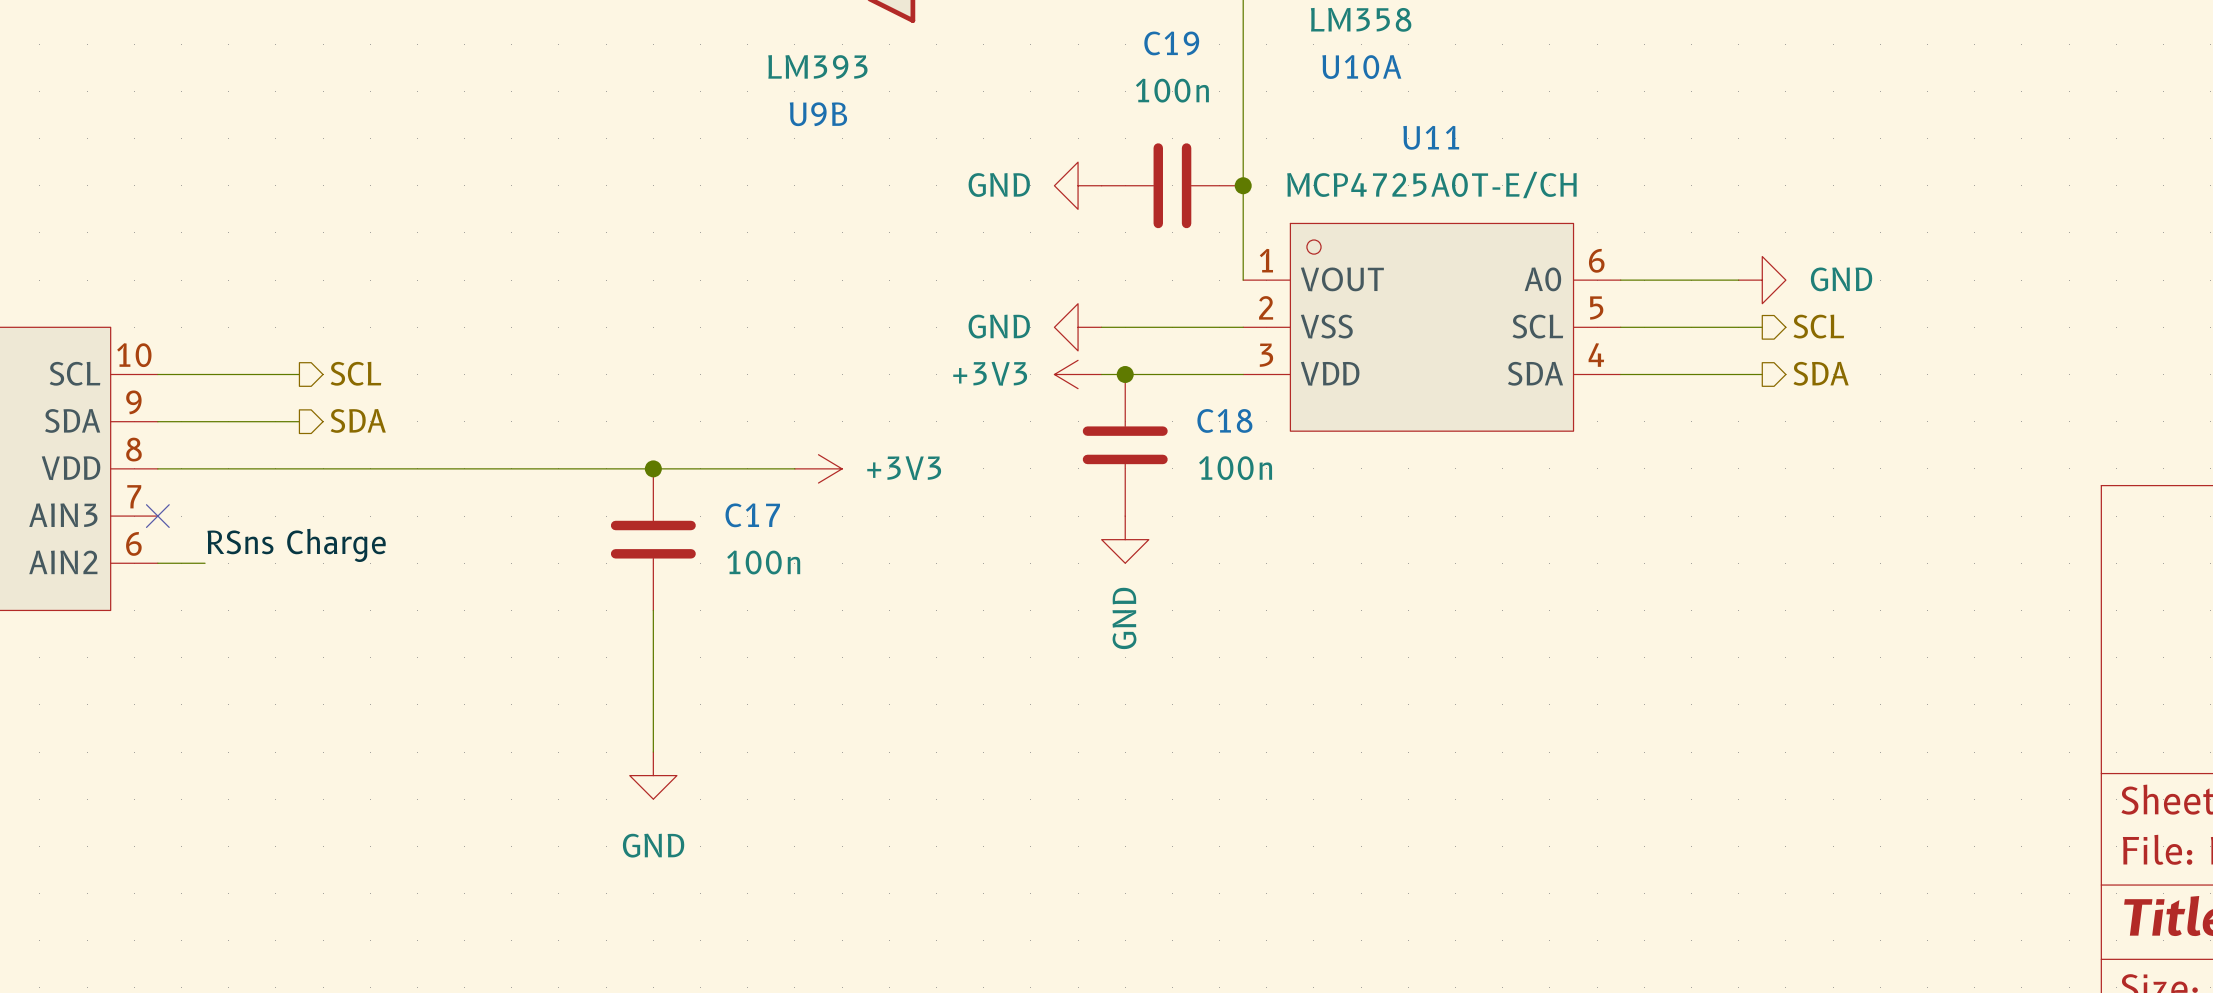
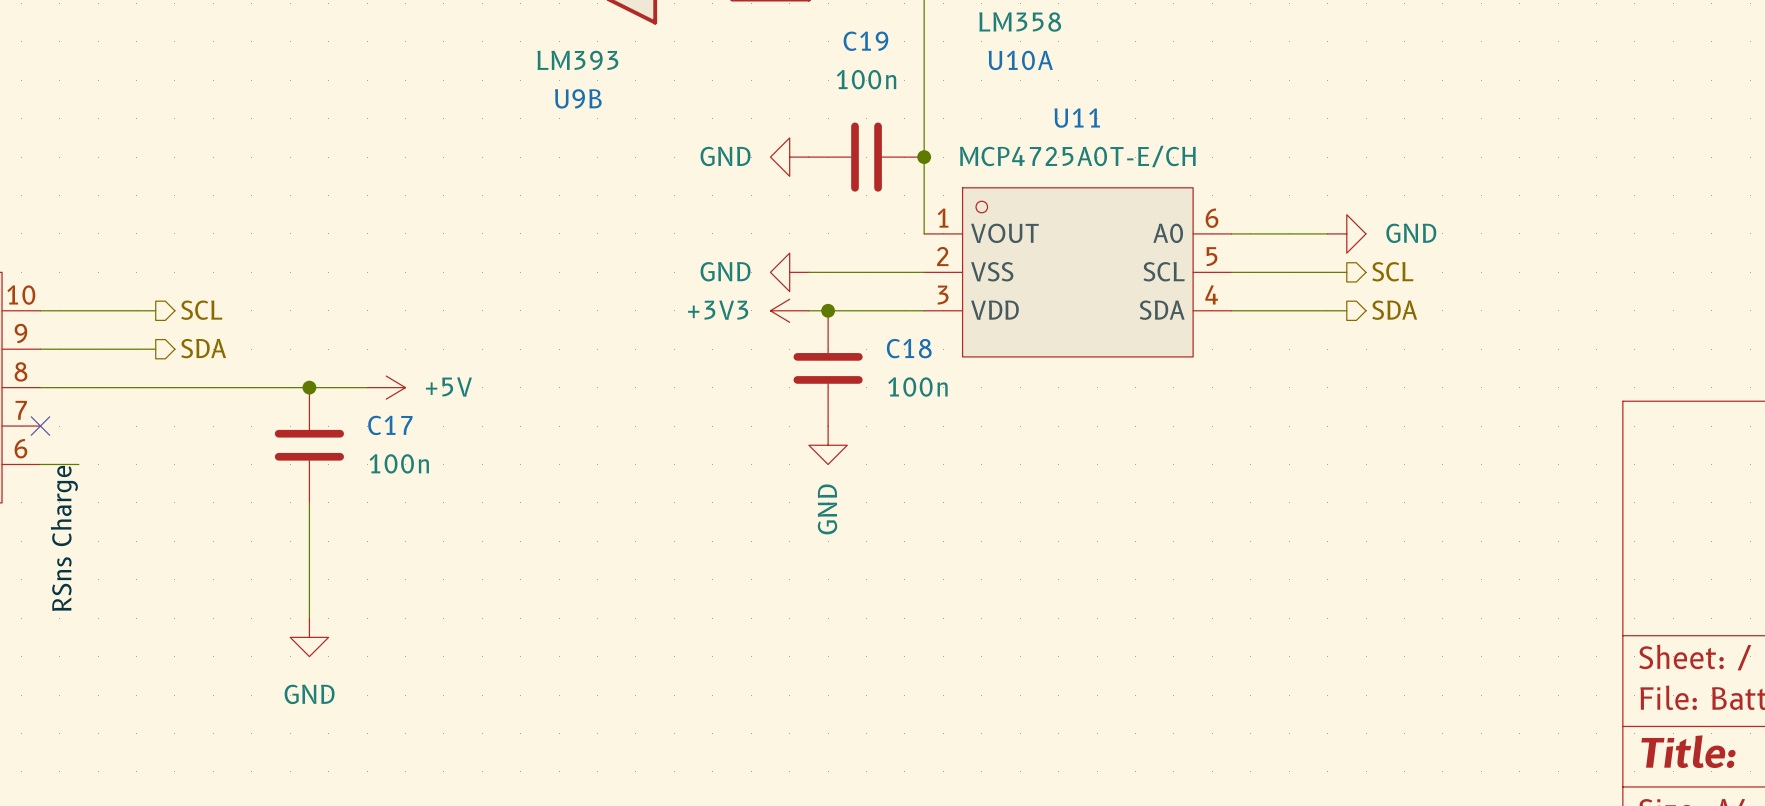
junction: none -> (309, 387)
wire: (558, 468) (794, 468) -> none
power symbol: none -> +5V (386, 387)
junction: (653, 468) -> none
power symbol: +3V3 (818, 468) -> none
C17 position: (653, 539) -> (309, 445)
label rotation: 0° (296, 545) -> 90° counterclockwise (64, 538)
wire: (653, 610) (653, 752) -> (309, 502) (309, 618)
power symbol position: GND (653, 775) -> GND (309, 637)

